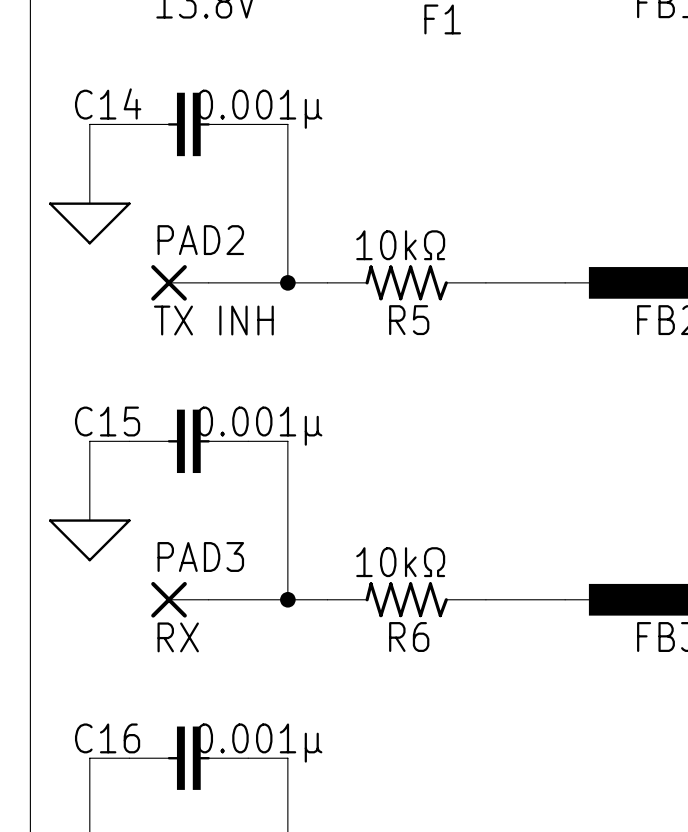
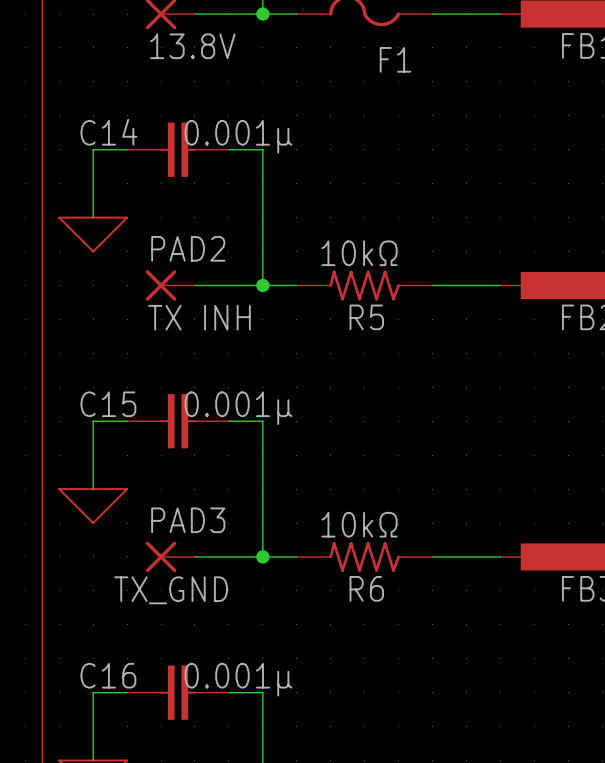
PAD3 value: RX (178, 637) -> TX_GND (171, 590)

